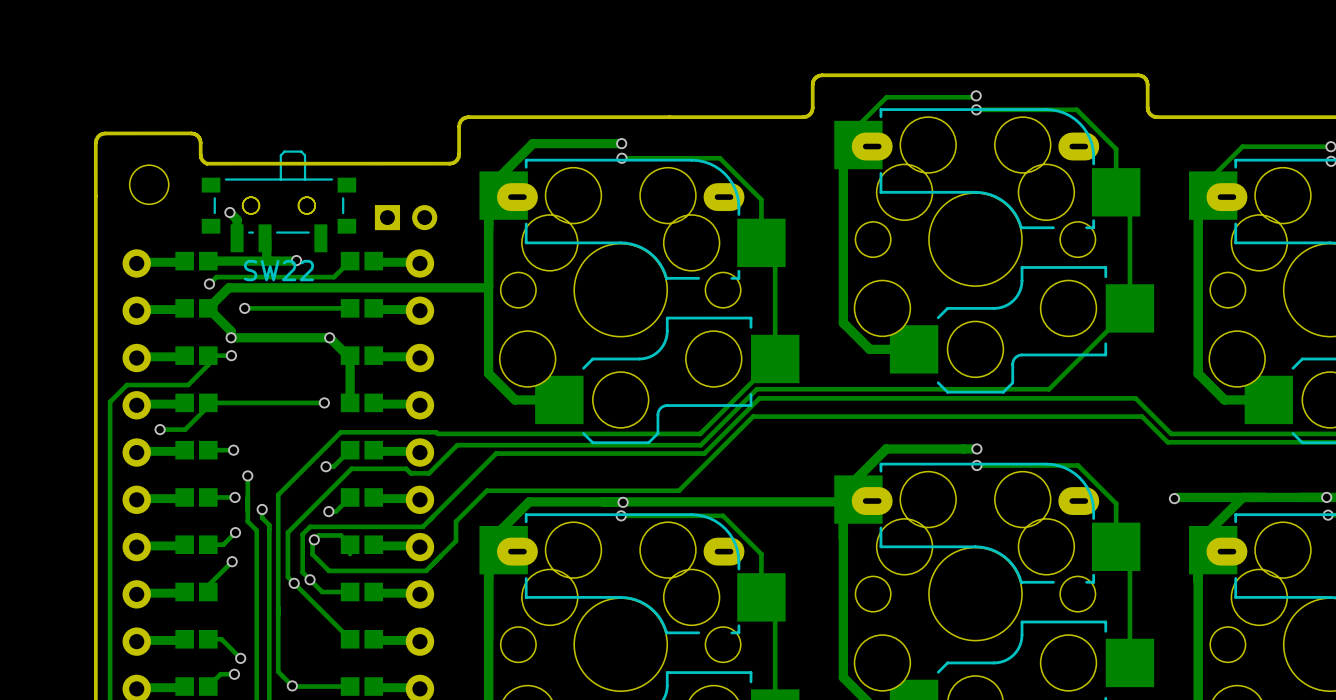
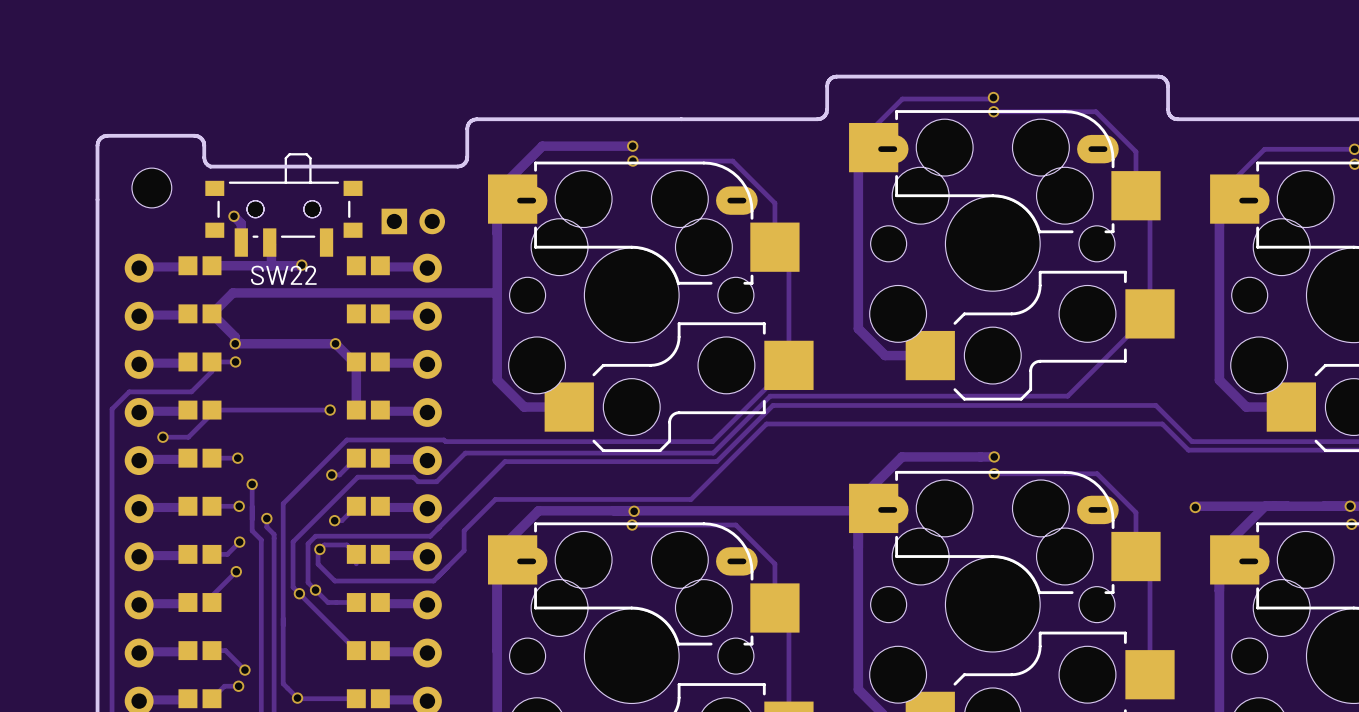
track: (350, 261) (334, 277) (216, 277) (209, 284) -> none
via: (209, 284) -> none
via: (244, 308) -> none
track: (350, 308) (244, 308) -> none

